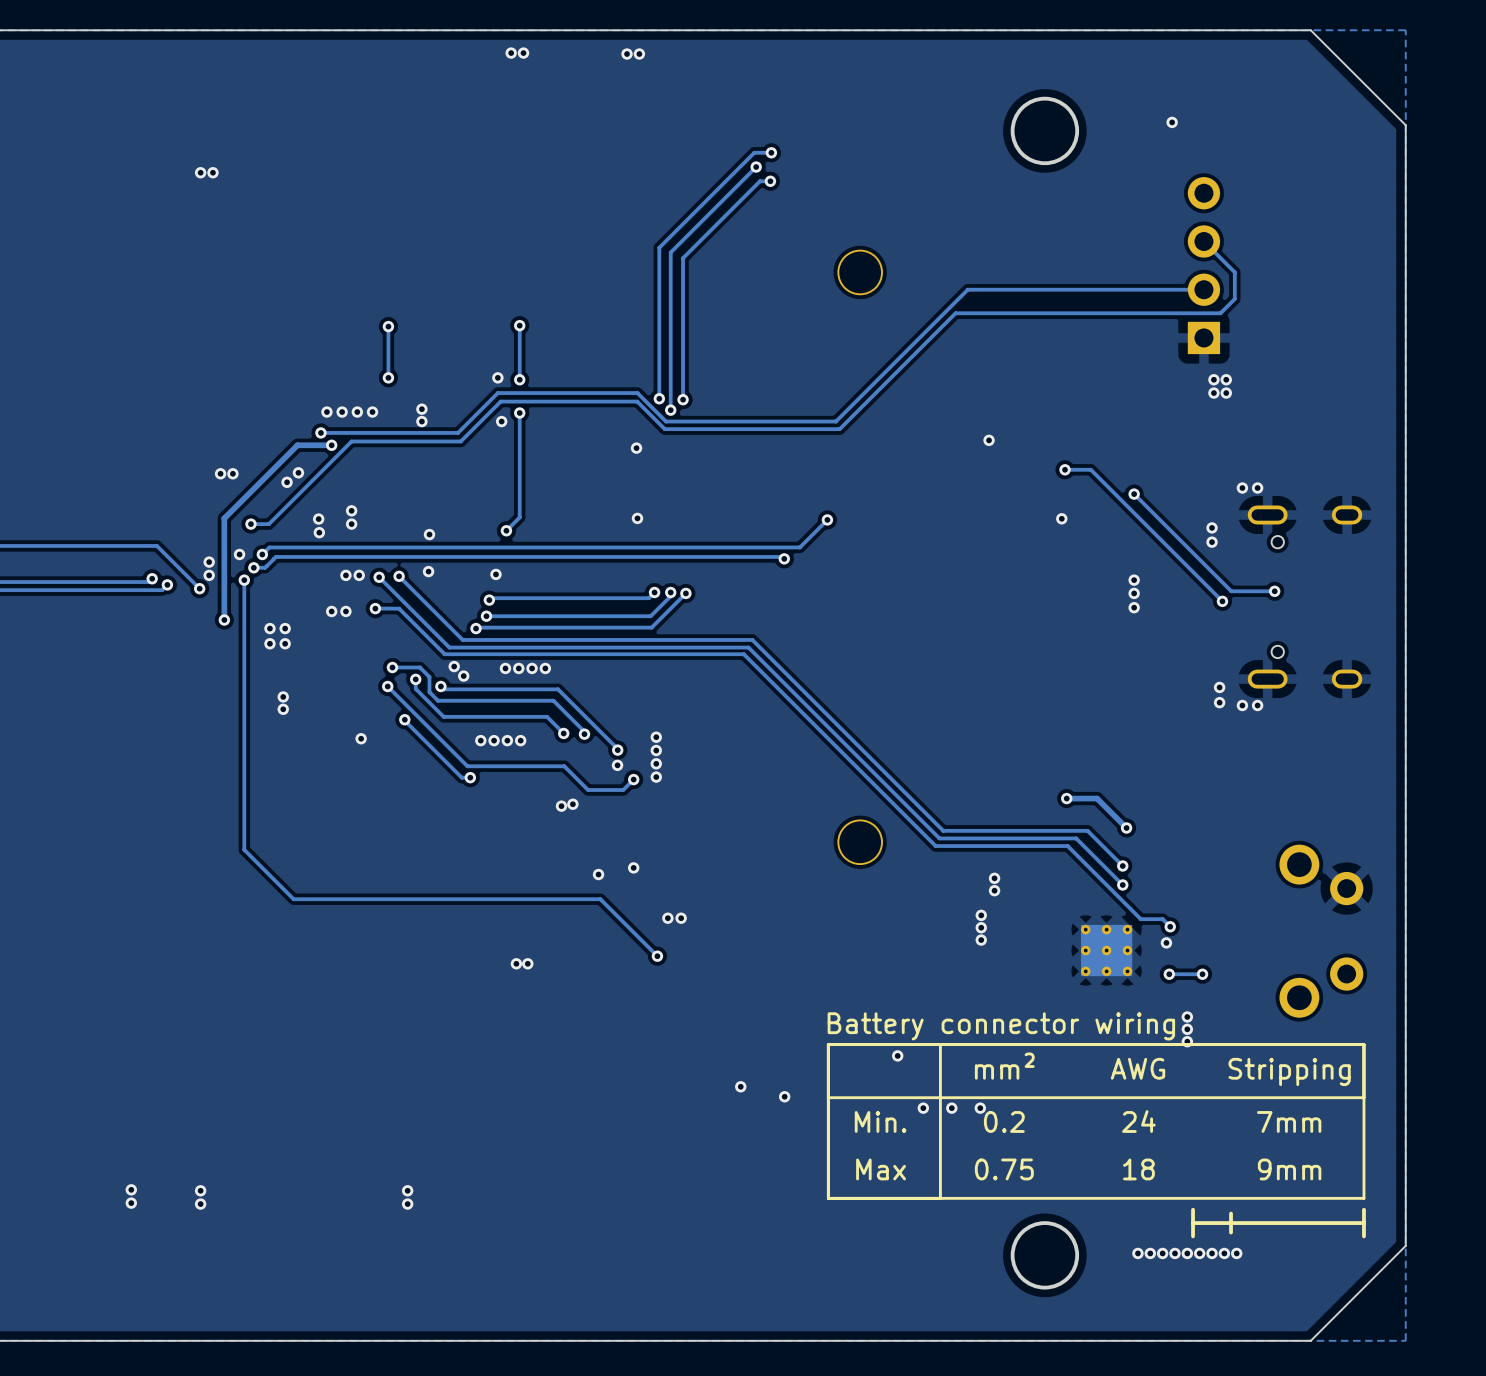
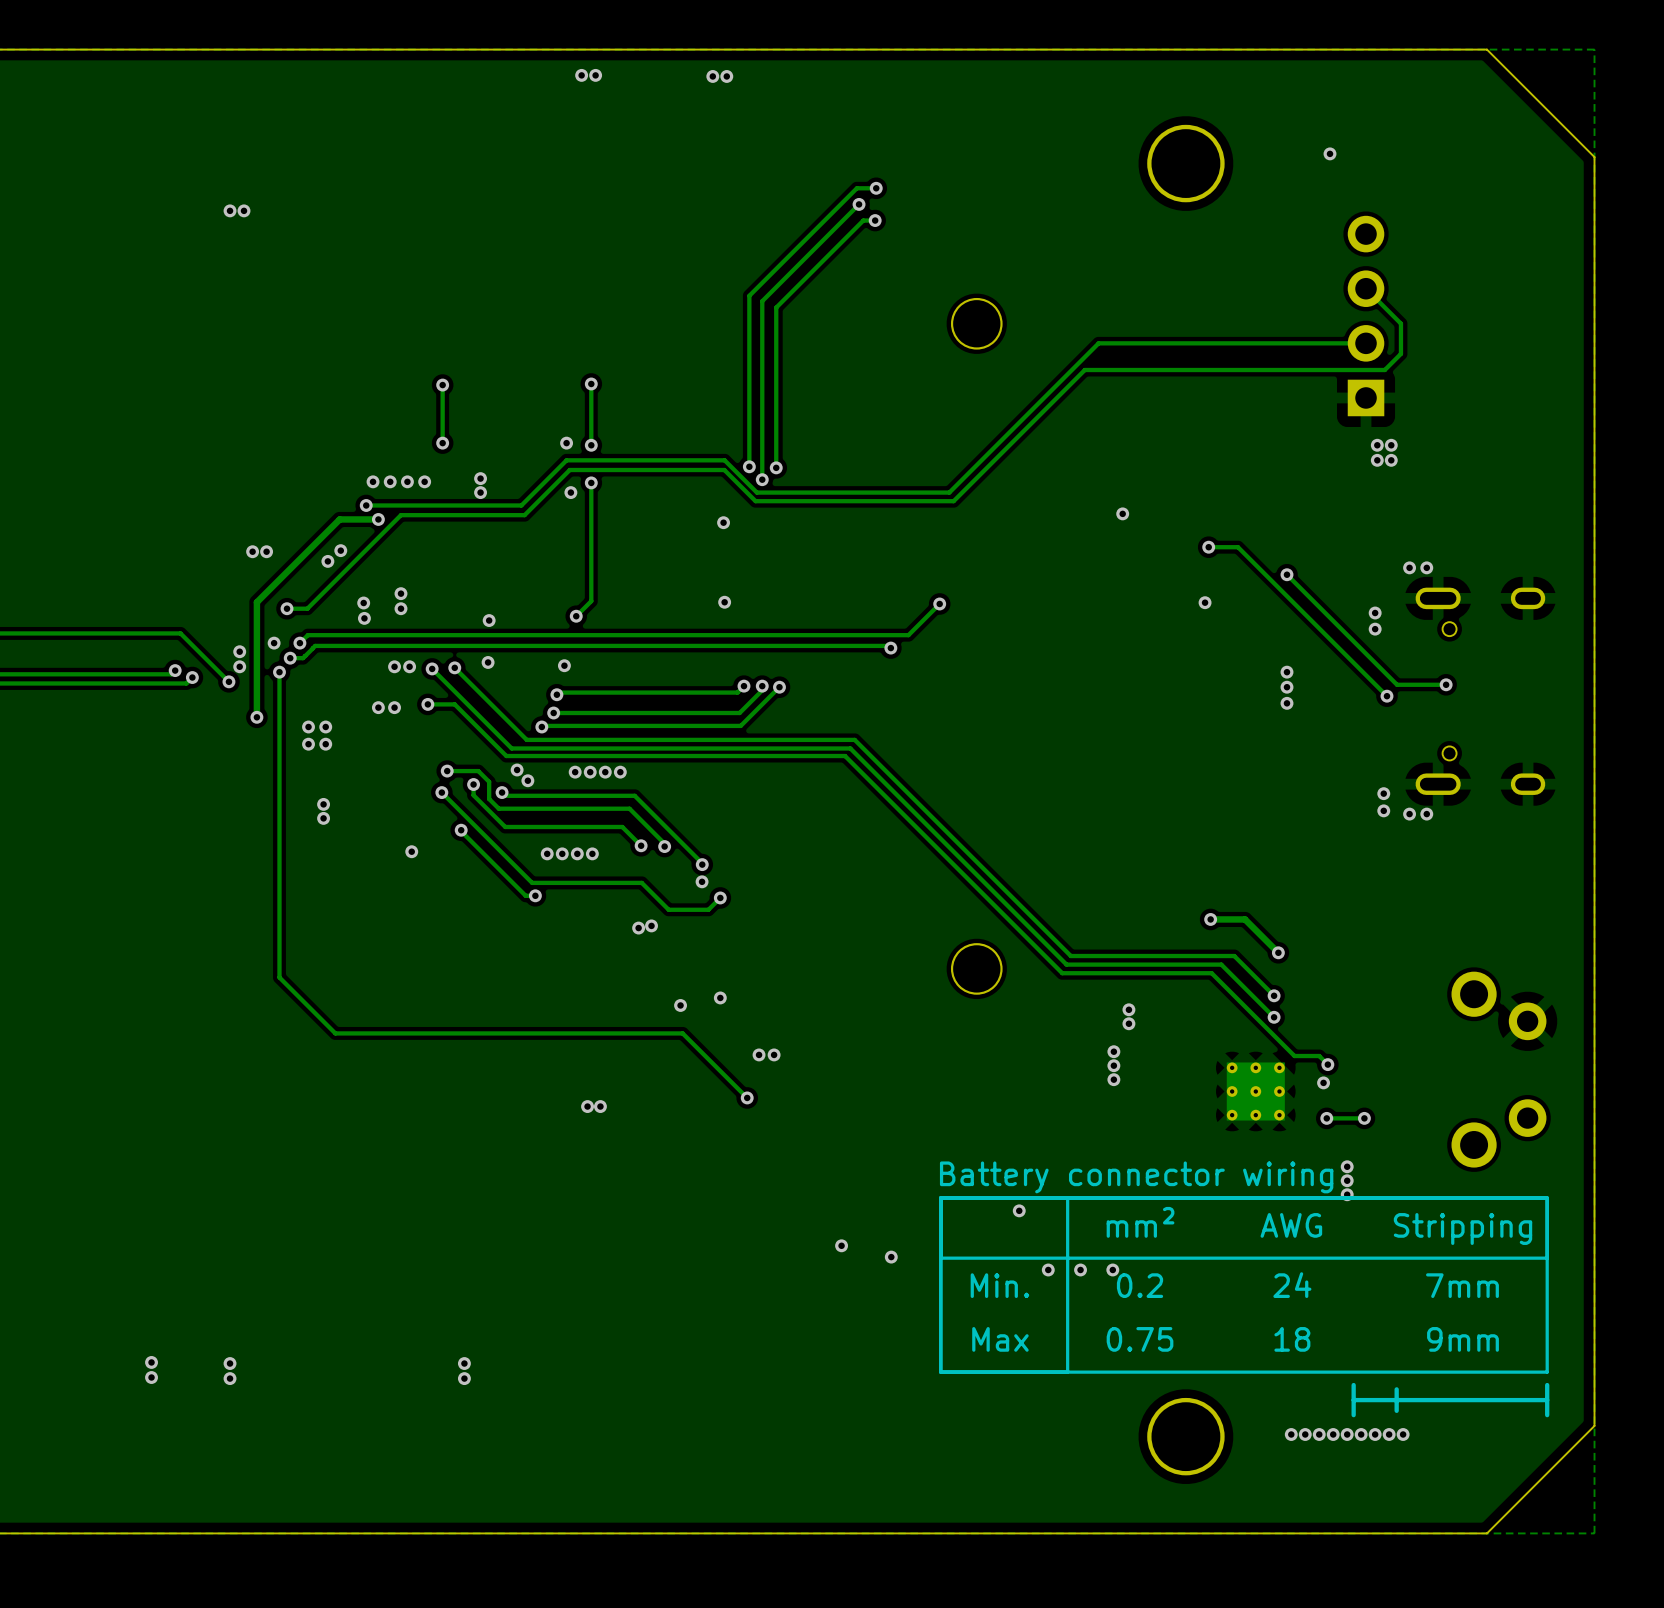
via: (656, 737) -> none
via: (656, 750) -> none
via: (656, 763) -> none
via: (656, 777) -> none

